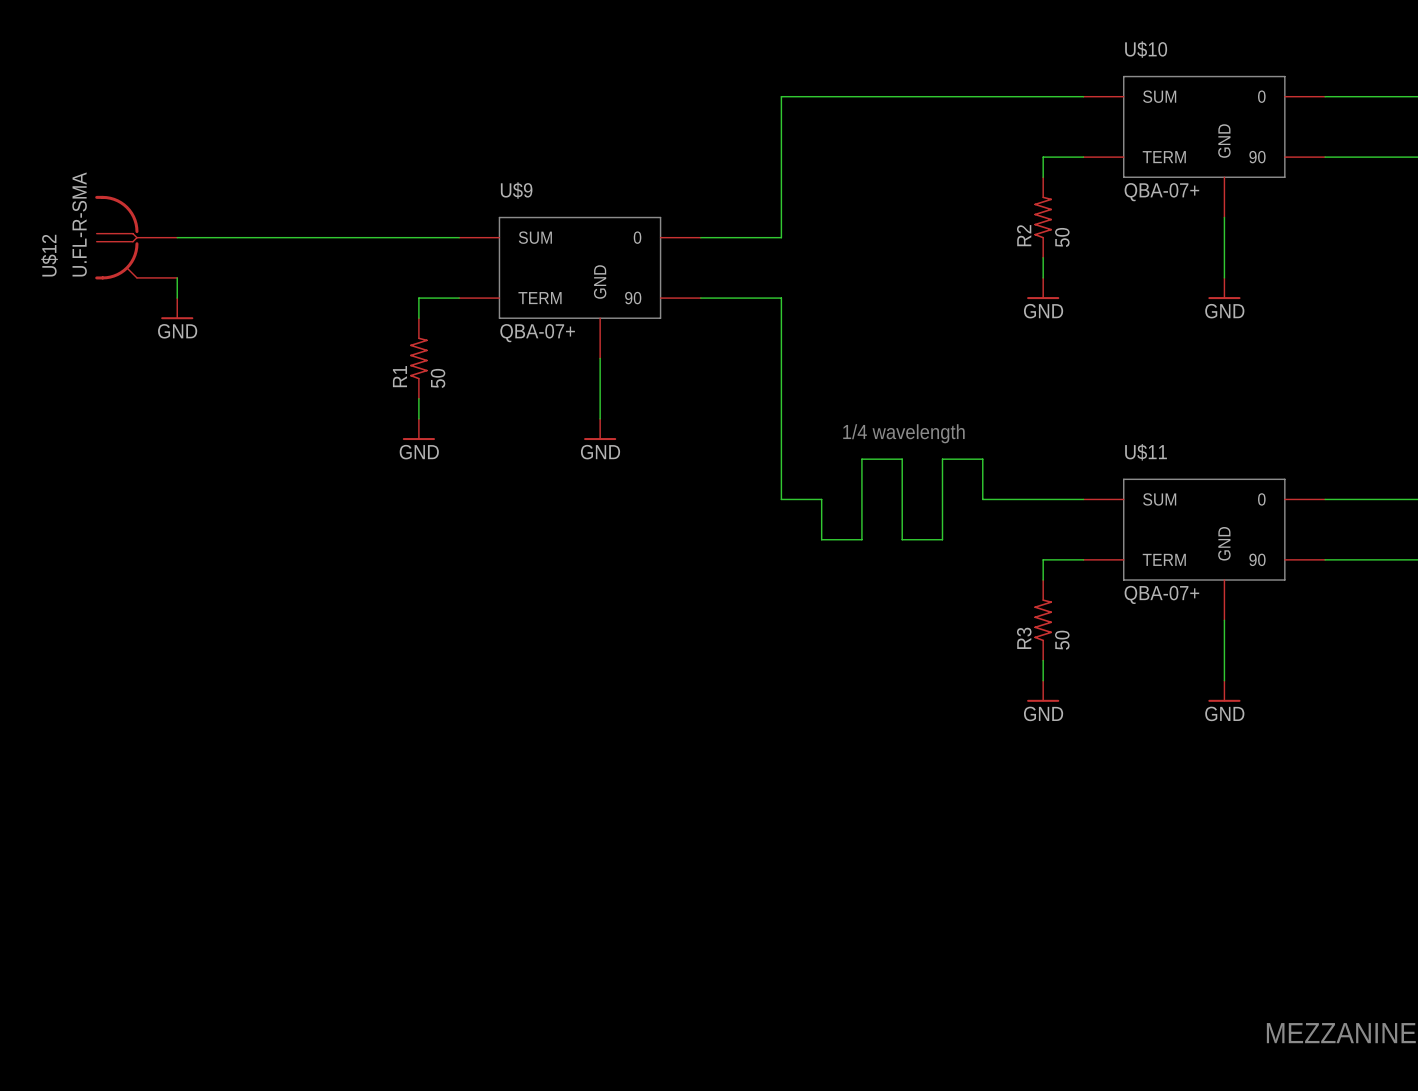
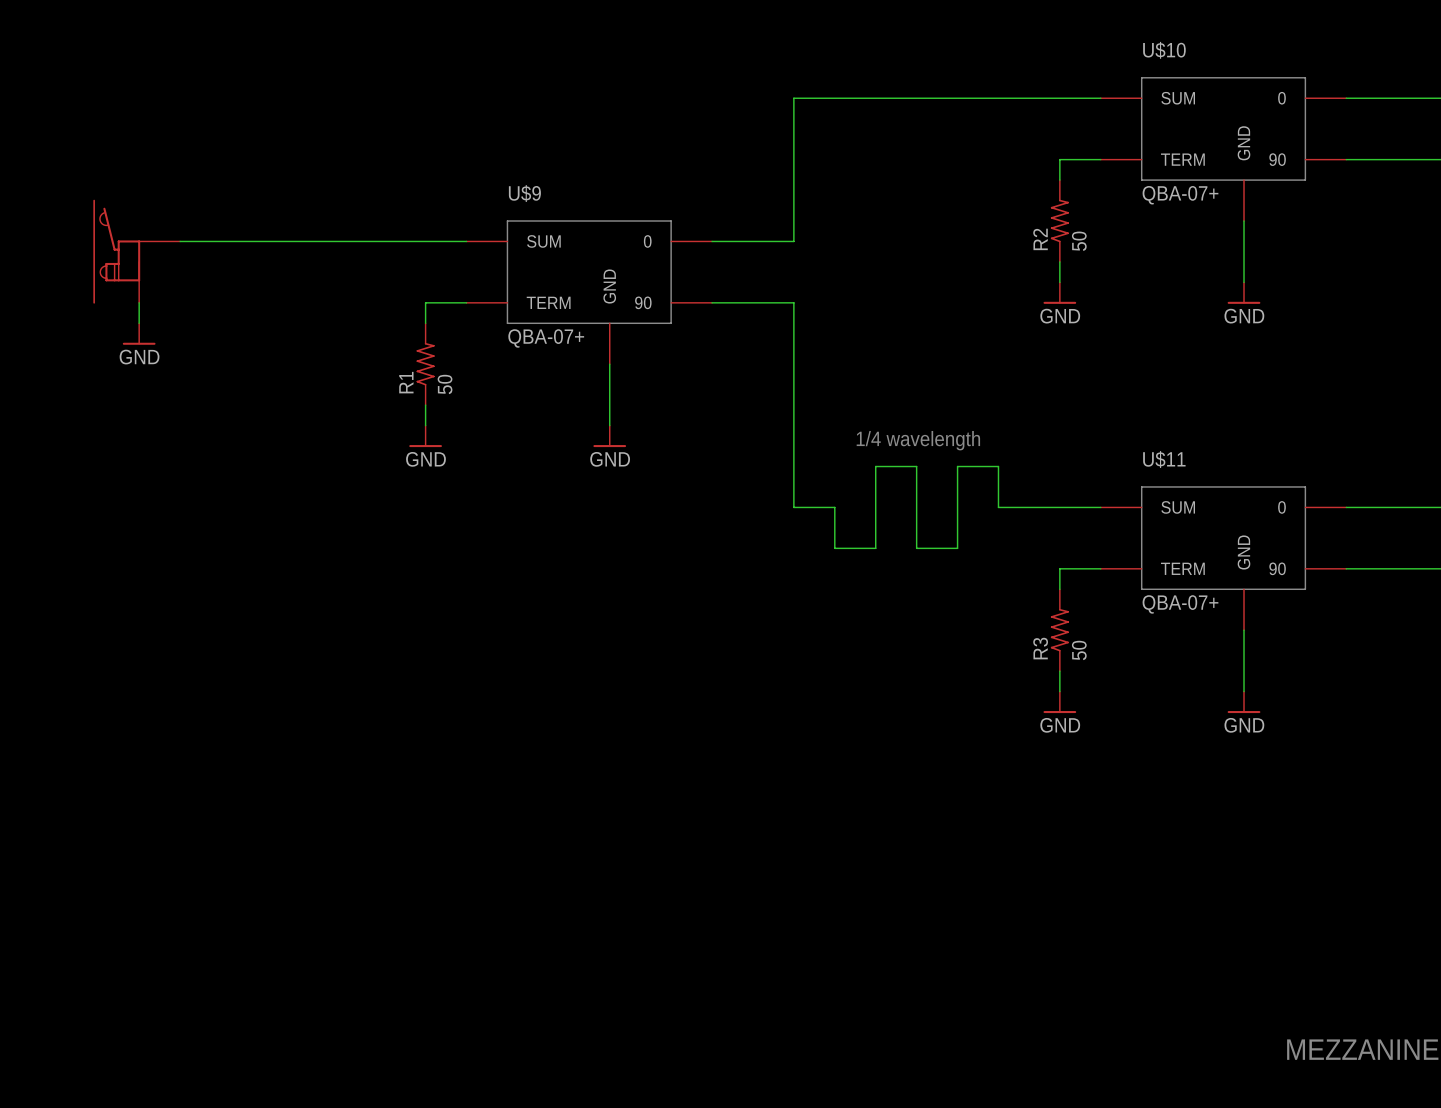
U$12: U.FL-R-SMA (136, 237) -> none
part: none -> (136, 251)
wire: (177, 277) (177, 298) -> (139, 302) (139, 323)
power symbol position: GND (177, 308) -> GND (139, 334)

